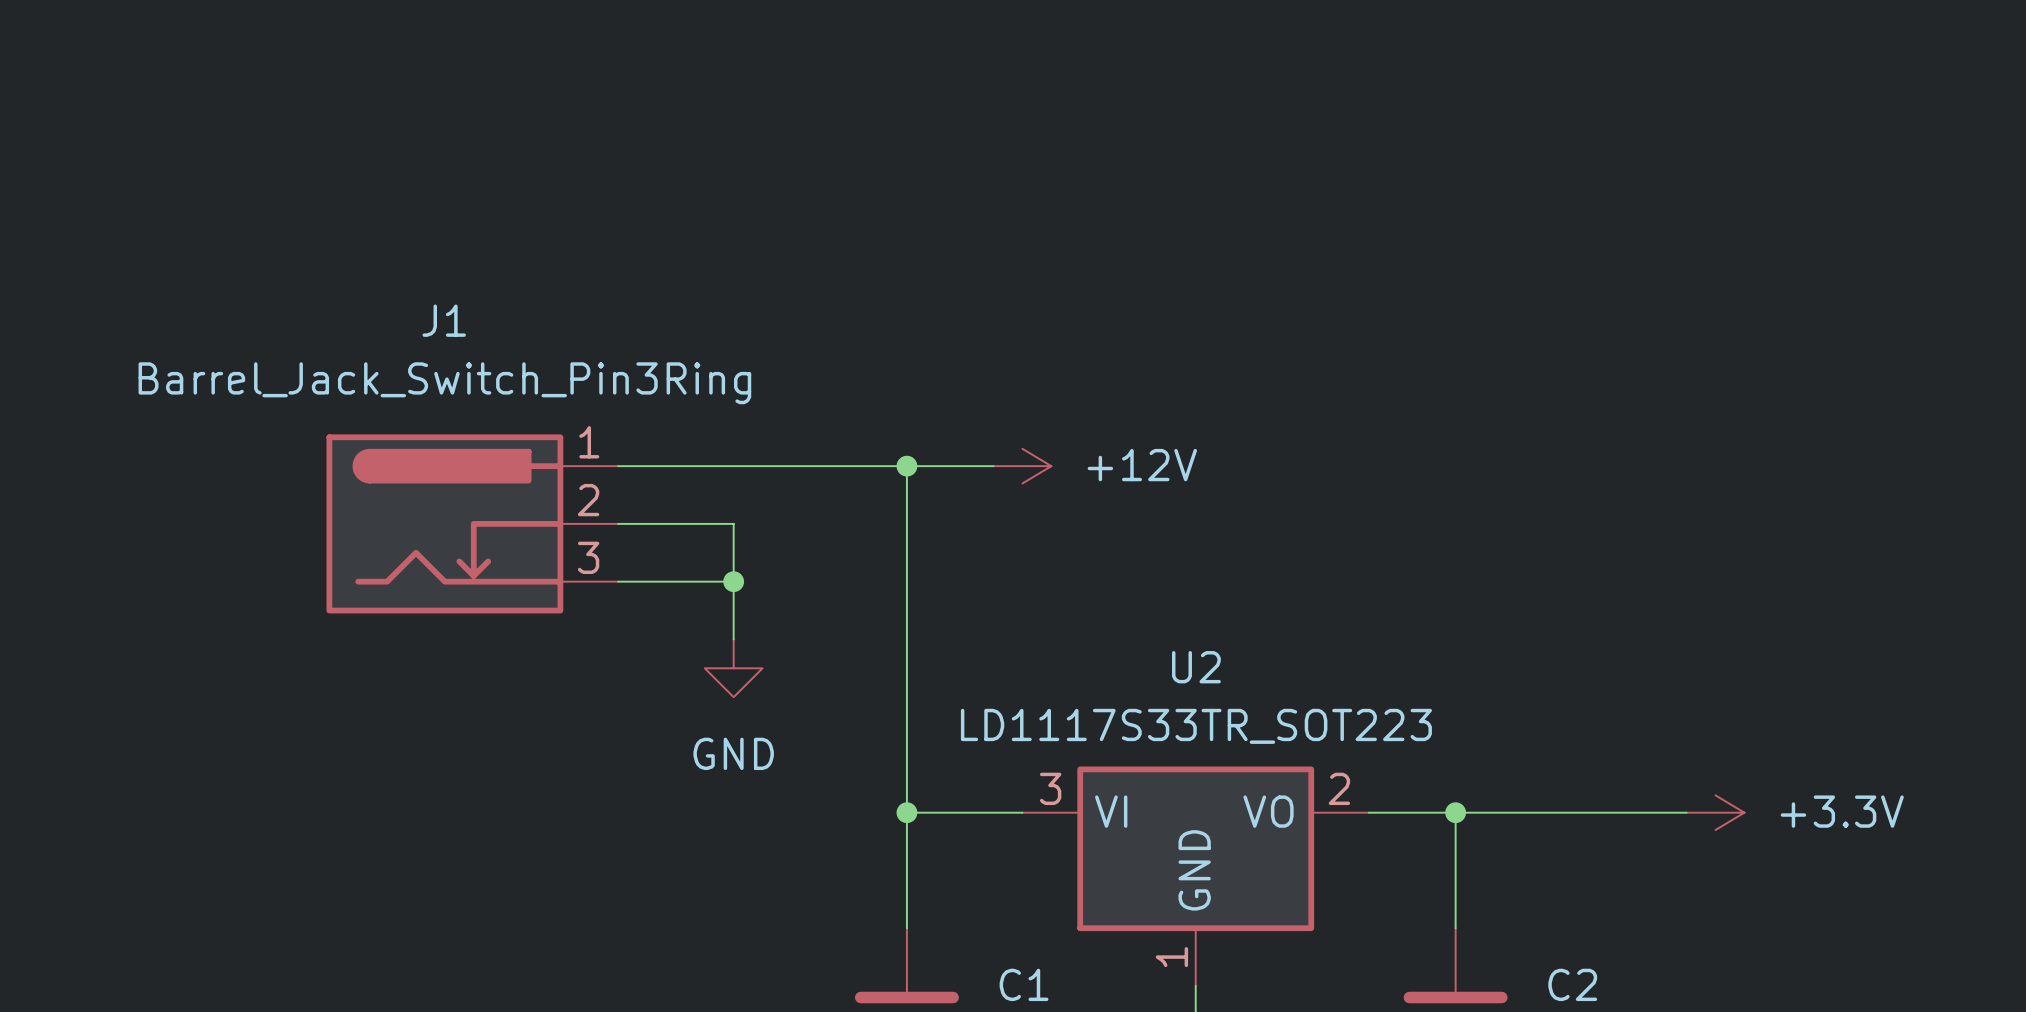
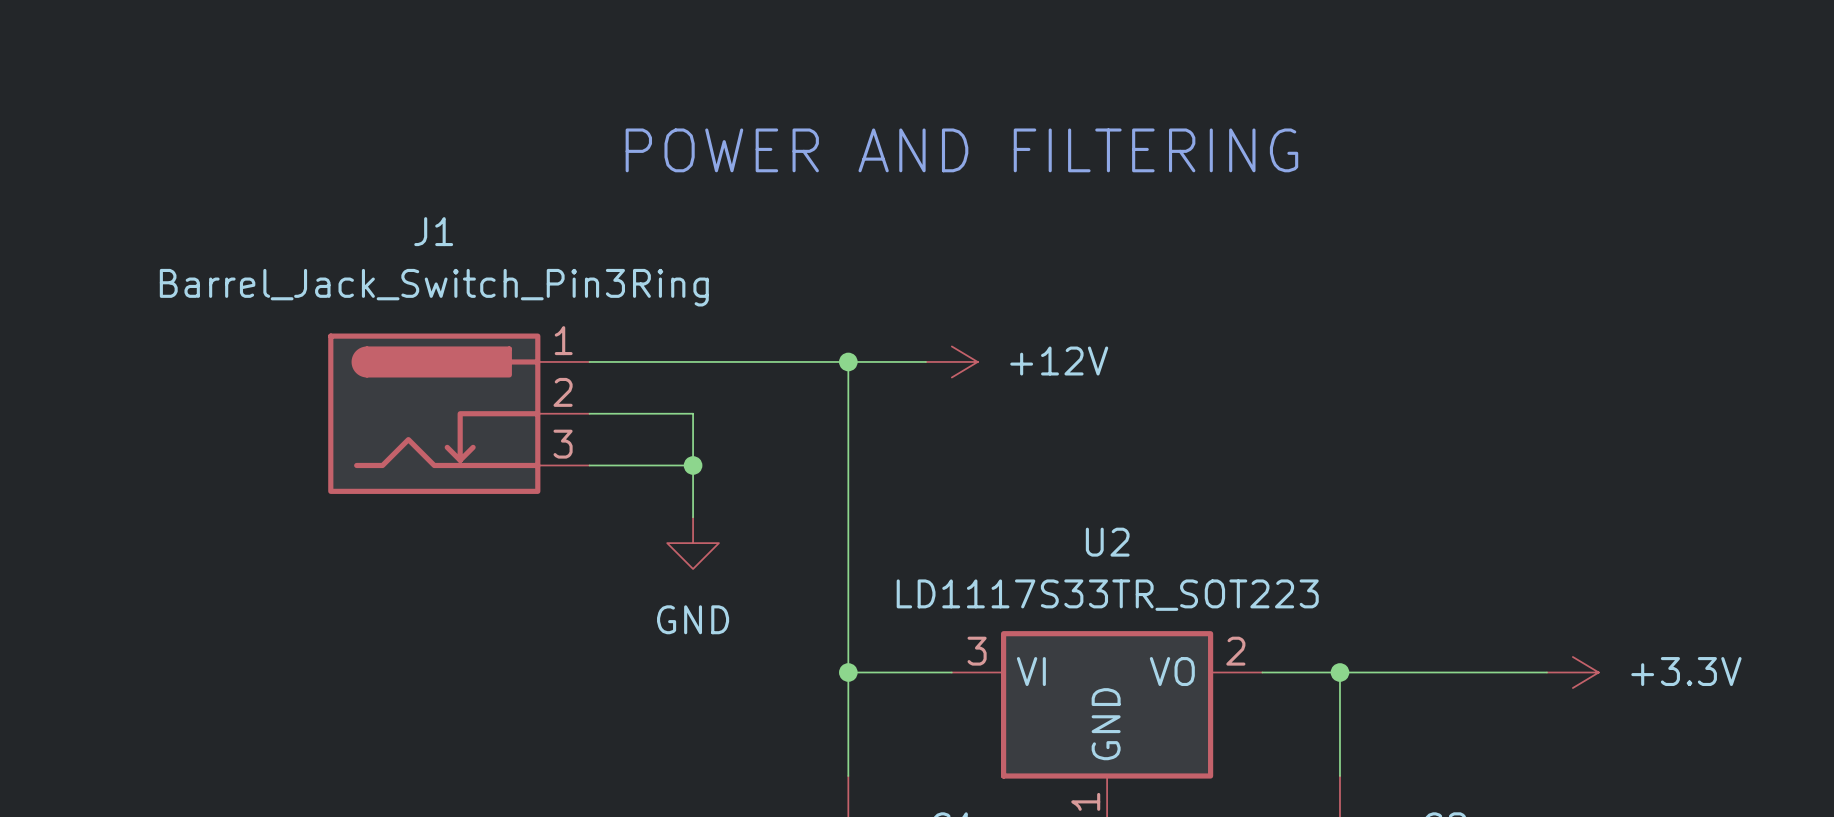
text: none -> POWER AND FILTERING (961, 150)

